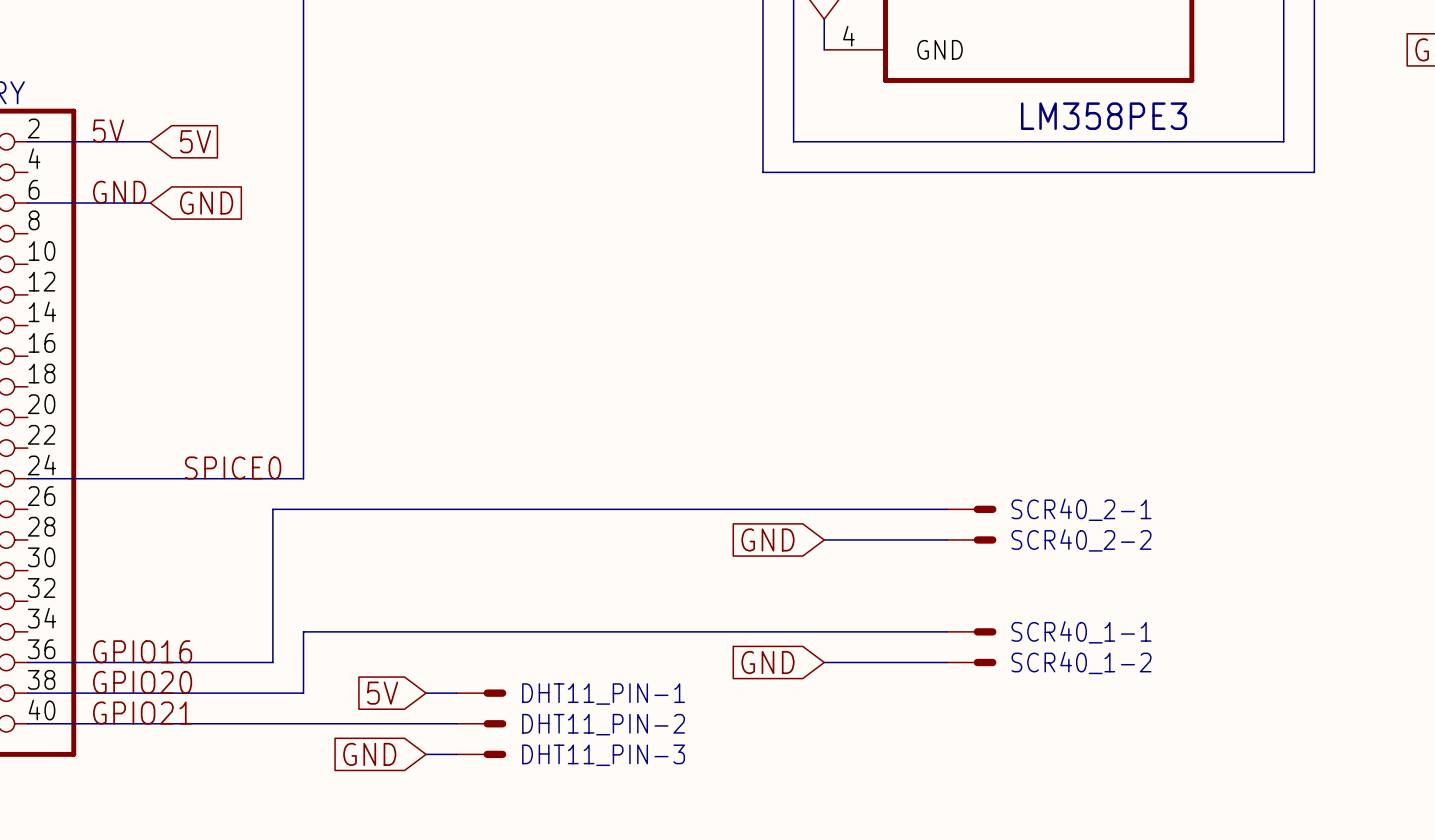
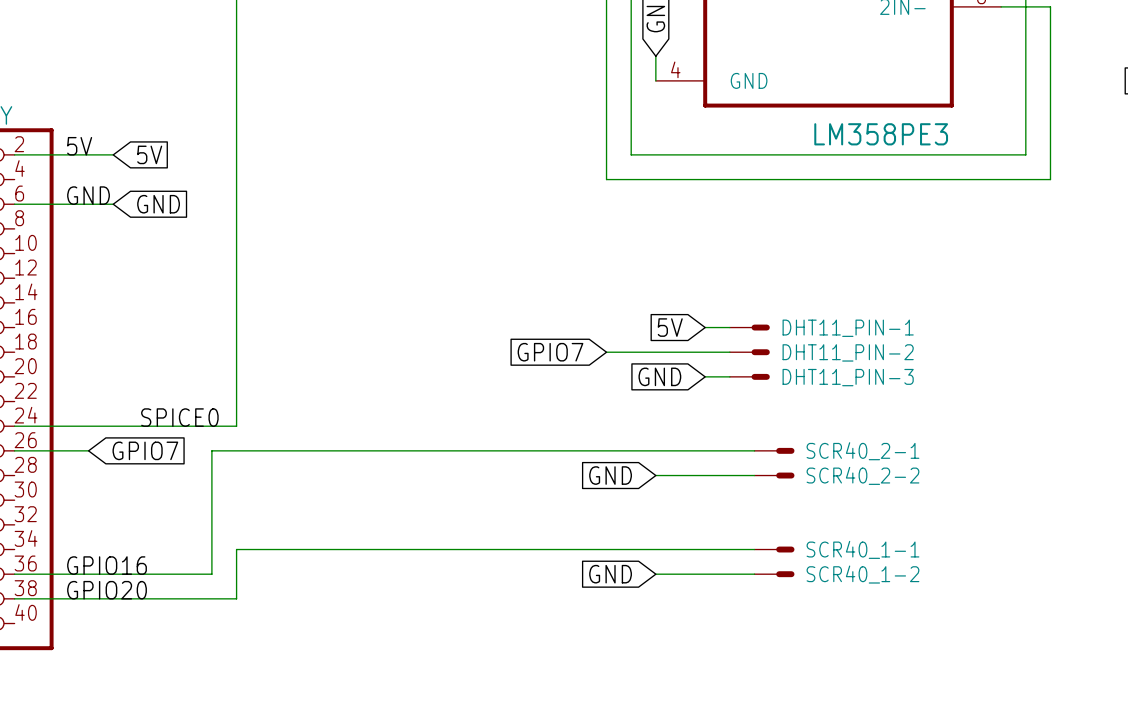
global label: none -> 5V (670, 327)
wire: none -> (705, 327) (729, 327)
global label: none -> GPIO7 (550, 352)
wire: none -> (606, 352) (729, 352)
global label: none -> GND (659, 376)
wire: none -> (705, 376) (729, 376)
wire: none -> (14, 450) (88, 450)
global label: none -> GPIO7 (145, 450)
global label: 5V (382, 693) -> none
wire: (426, 693) (456, 693) -> none
DHT11_PIN-1 position: (481, 693) -> (749, 327)
label: GPIO21 (142, 713) -> none
wire: (27, 723) (456, 723) -> none
DHT11_PIN-2 position: (481, 723) -> (749, 352)
global label: GND (369, 754) -> none
wire: (426, 754) (456, 754) -> none
DHT11_PIN-3 position: (481, 754) -> (749, 376)

